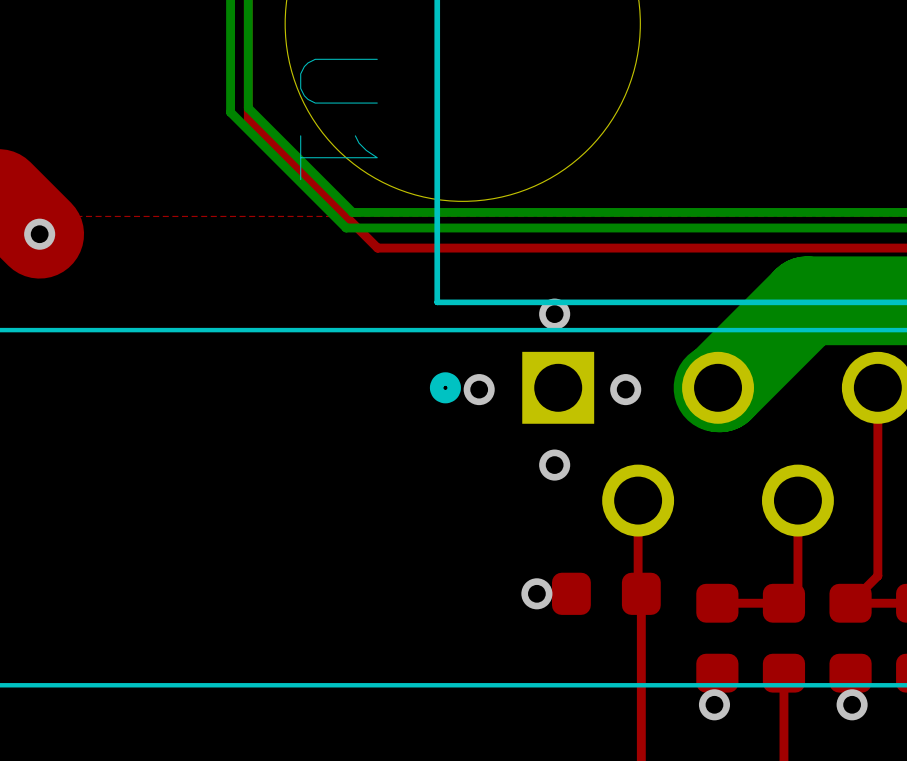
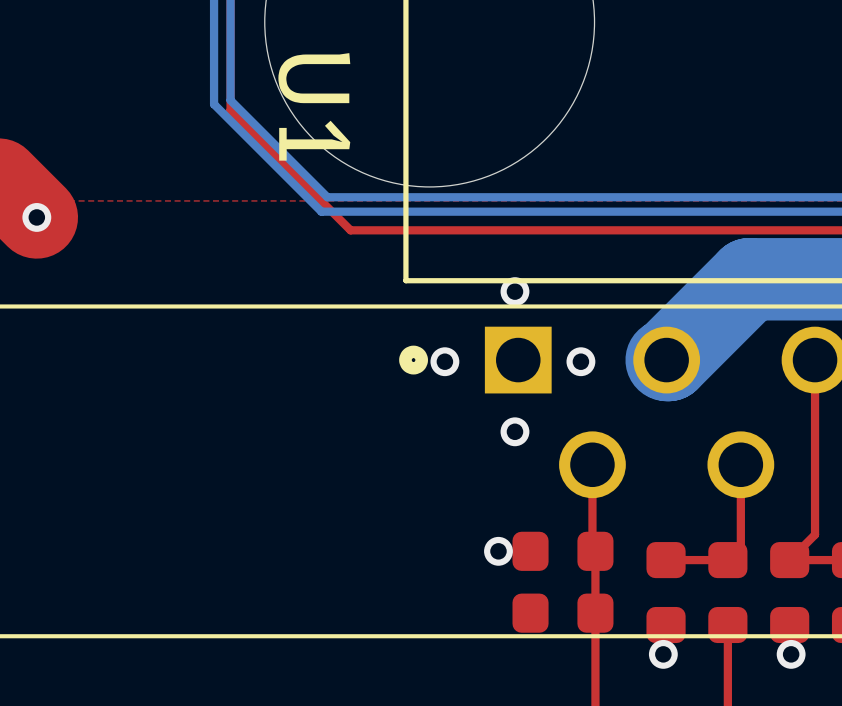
part: none -> (562, 613)

